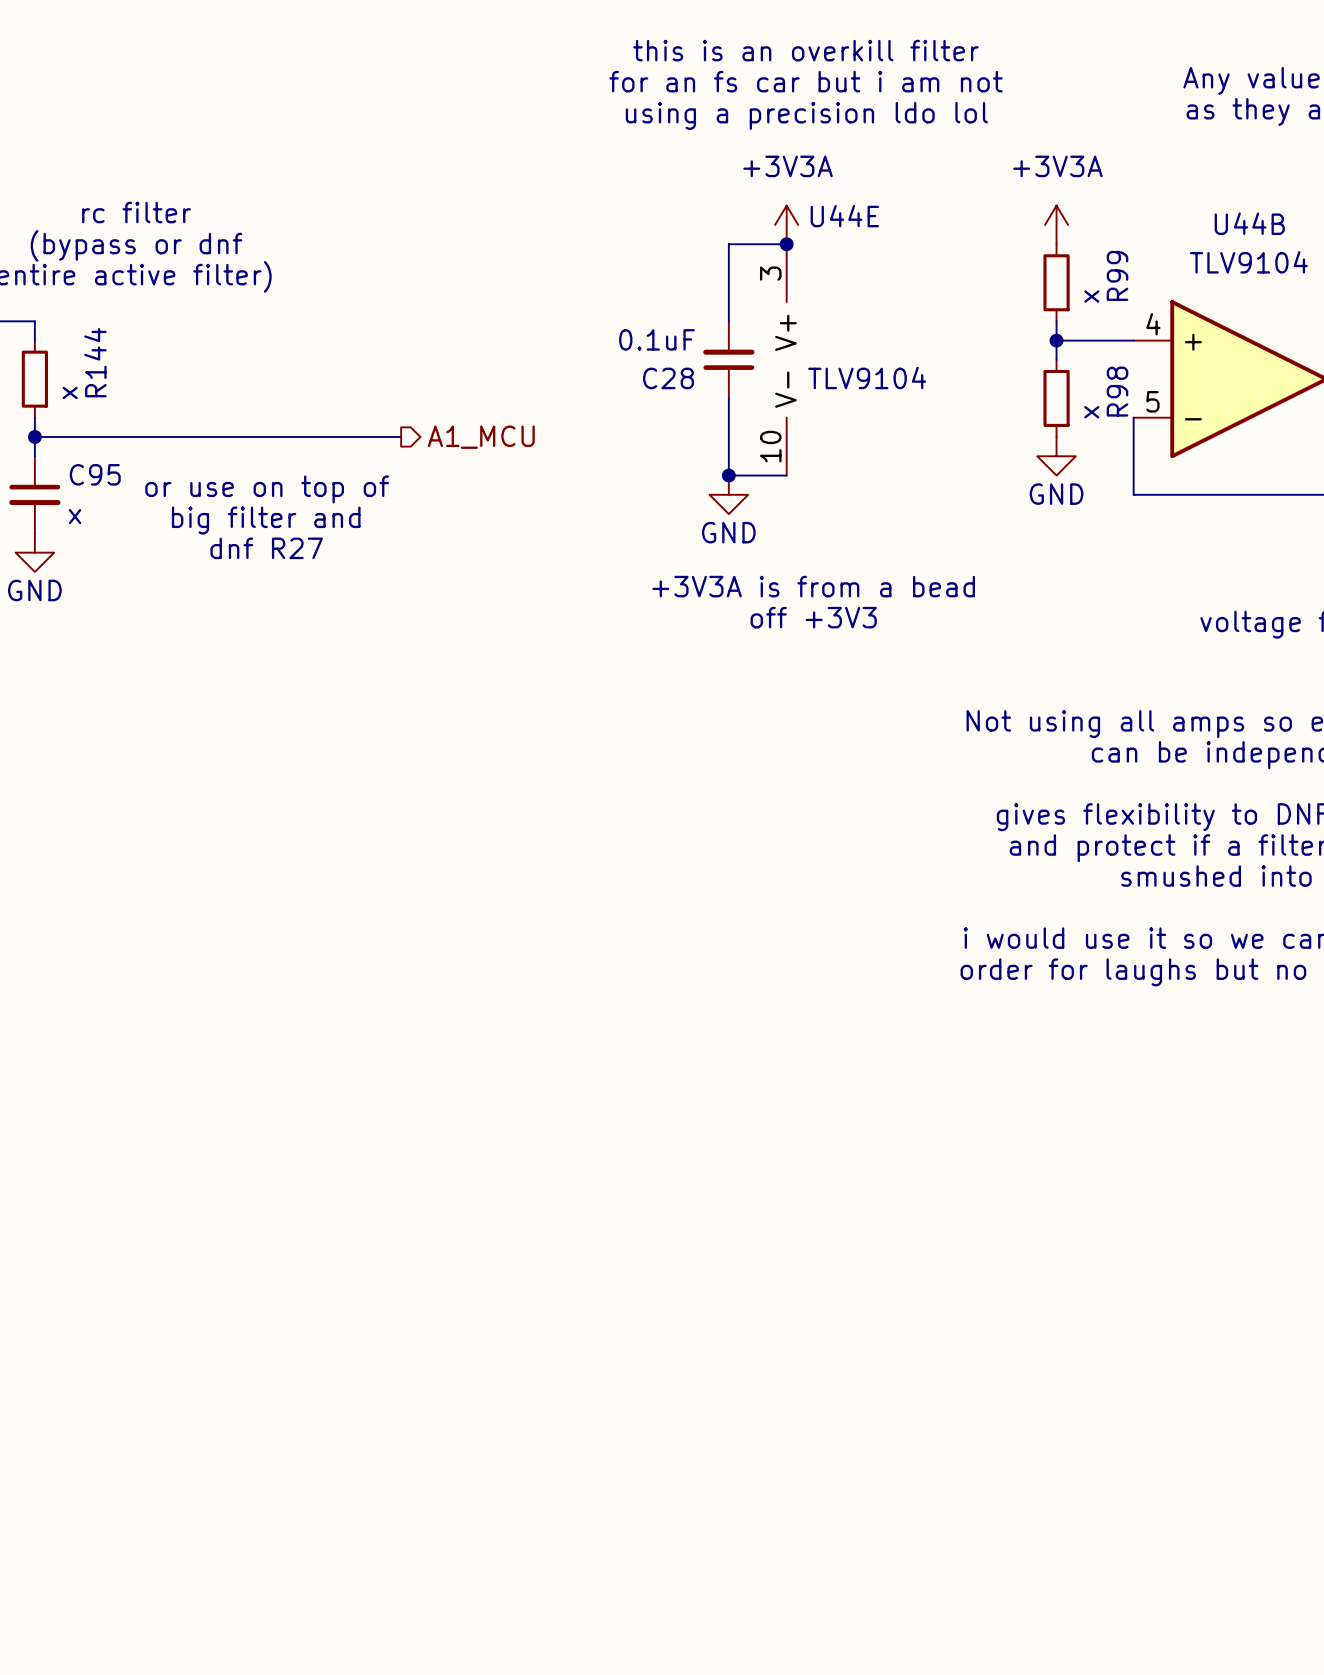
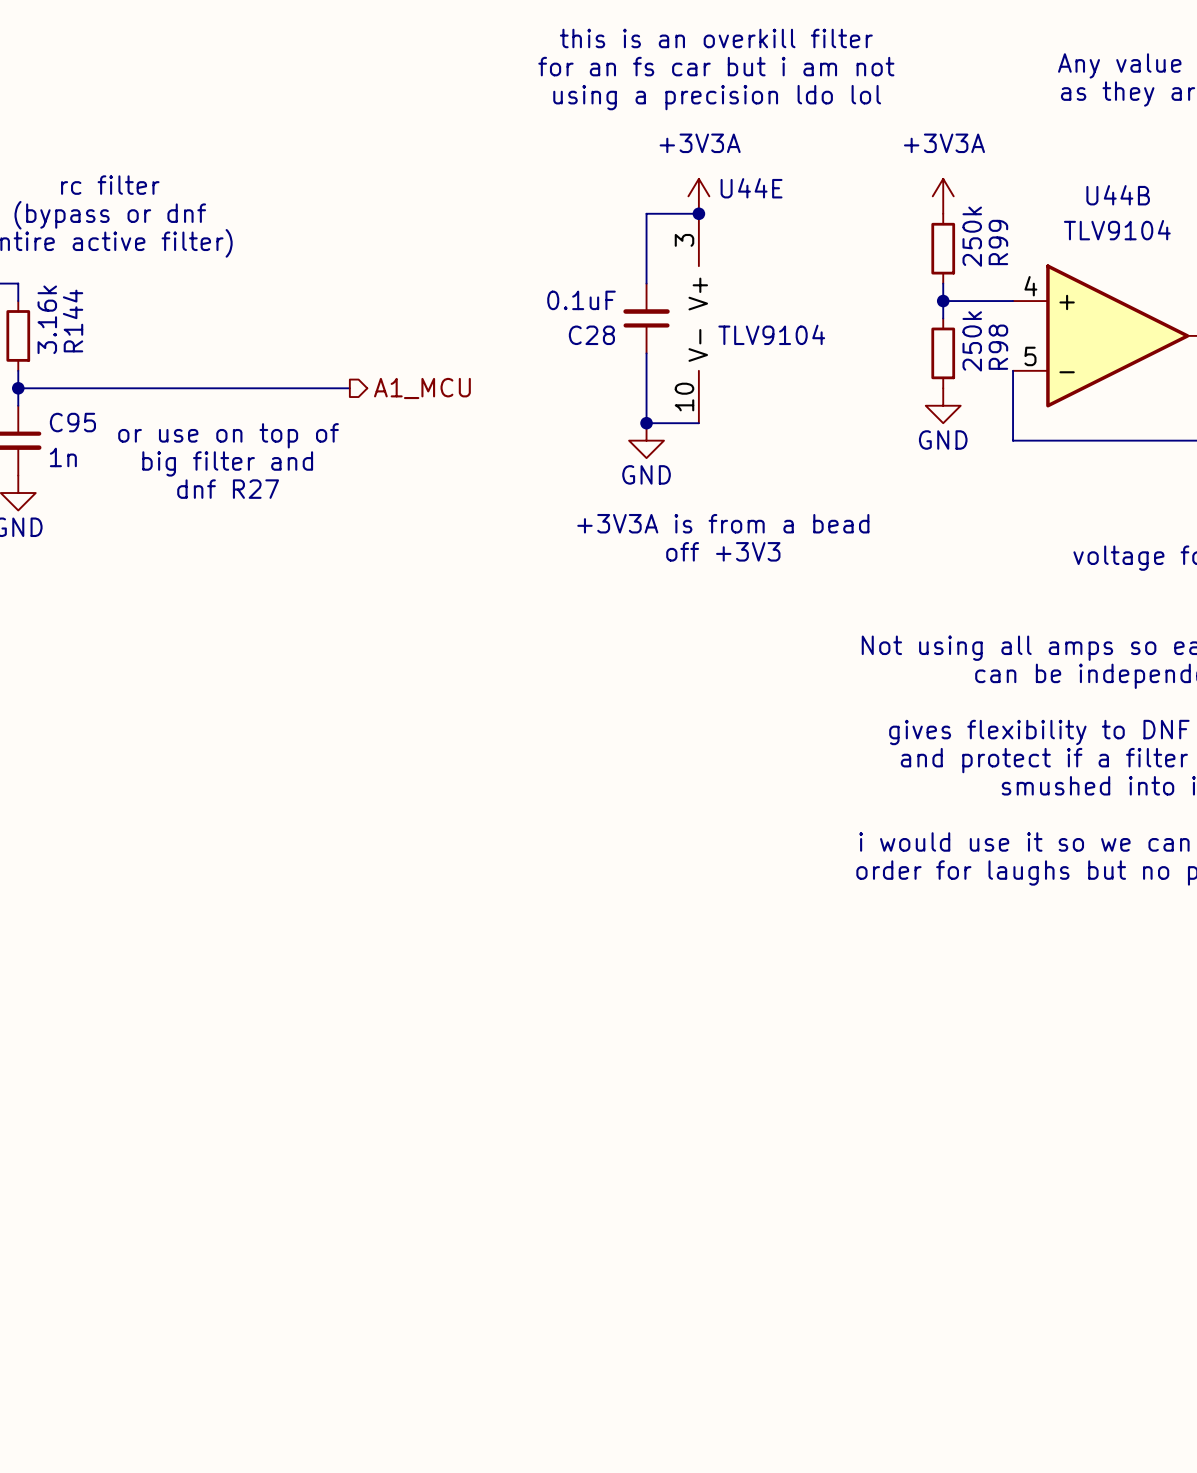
R99 value: x (1091, 296) -> 250k (972, 236)
R144 value: x (70, 392) -> 3.16k (47, 319)
R98 value: x (1091, 412) -> 250k (972, 341)
C95 value: x (75, 516) -> 1n (63, 457)

